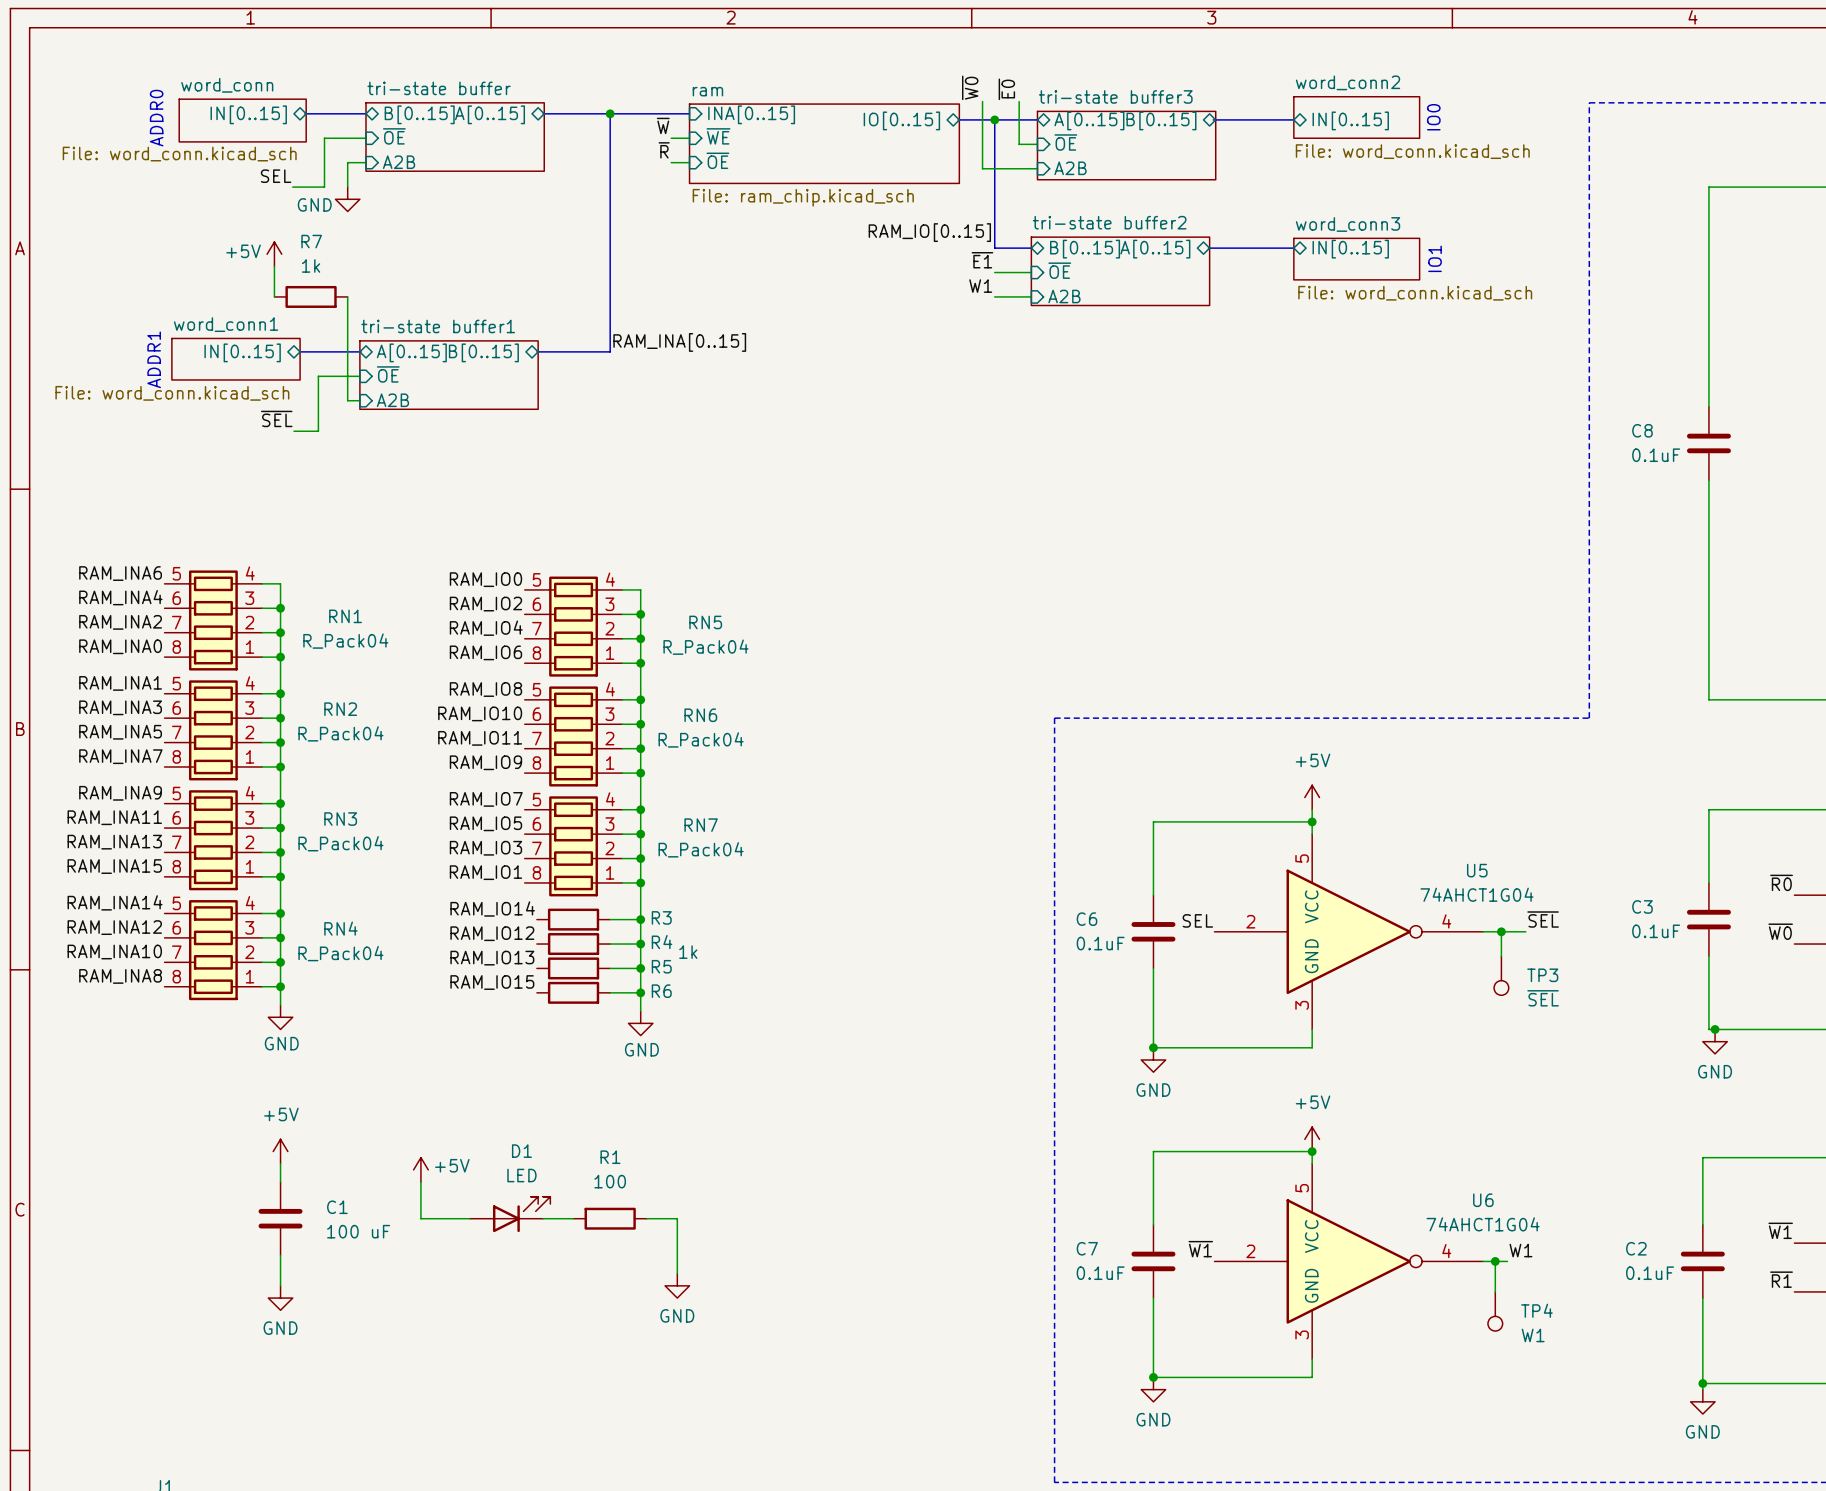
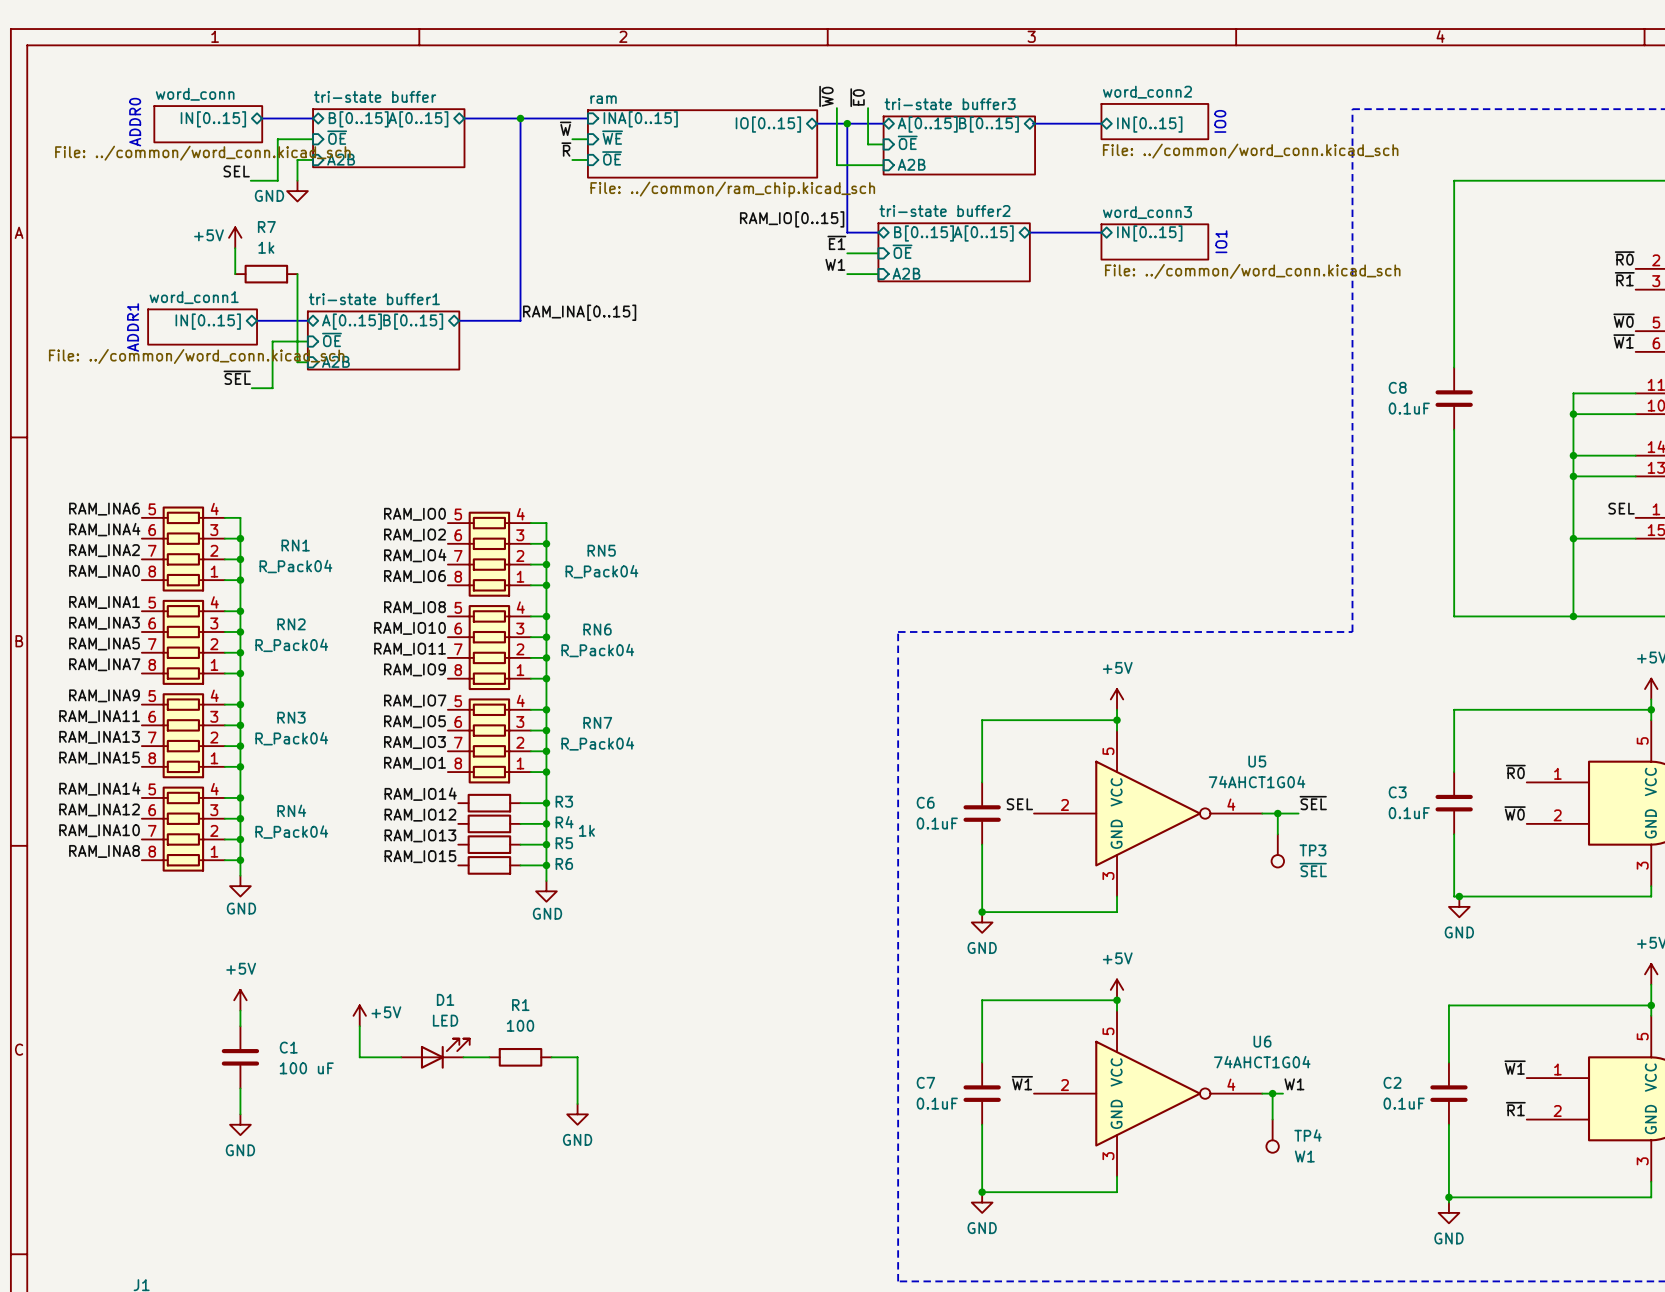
sheet word_conn2 value: File: word_conn.kicad_sch (1412, 151) -> File: ../common/word_conn.kicad_sch (1250, 151)
sheet word_conn value: File: word_conn.kicad_sch (179, 154) -> File: ../common/word_conn.kicad_sch (202, 153)
sheet ram value: File: ram_chip.kicad_sch (803, 197) -> File: ../common/ram_chip.kicad_sch (732, 189)
sheet word_conn3 value: File: word_conn.kicad_sch (1415, 293) -> File: ../common/word_conn.kicad_sch (1252, 271)
sheet word_conn1 value: File: word_conn.kicad_sch (172, 393) -> File: ../common/word_conn.kicad_sch (196, 356)

